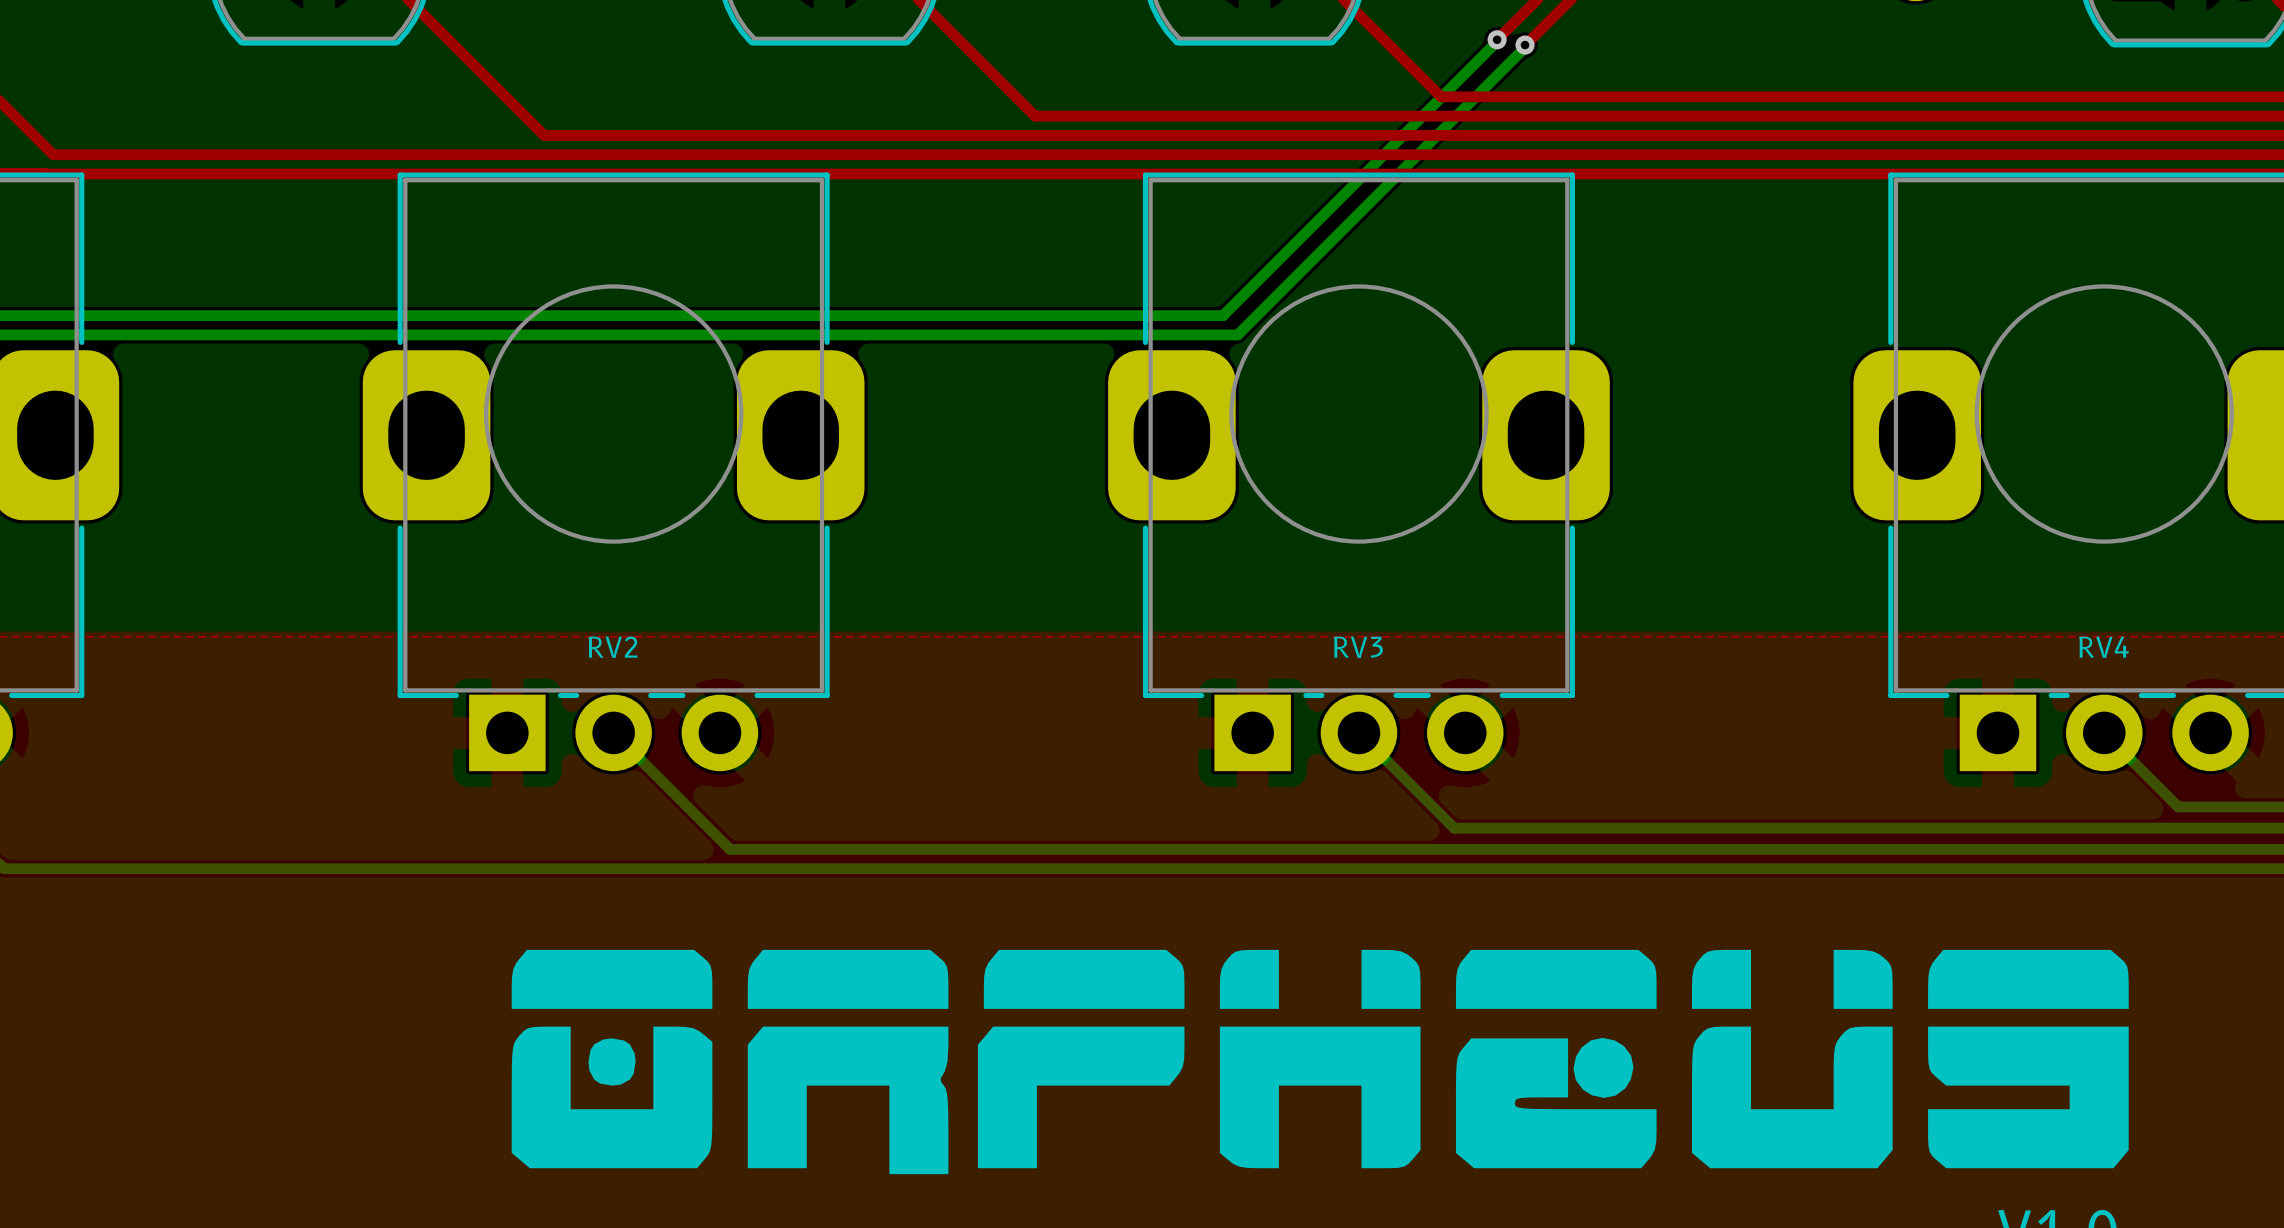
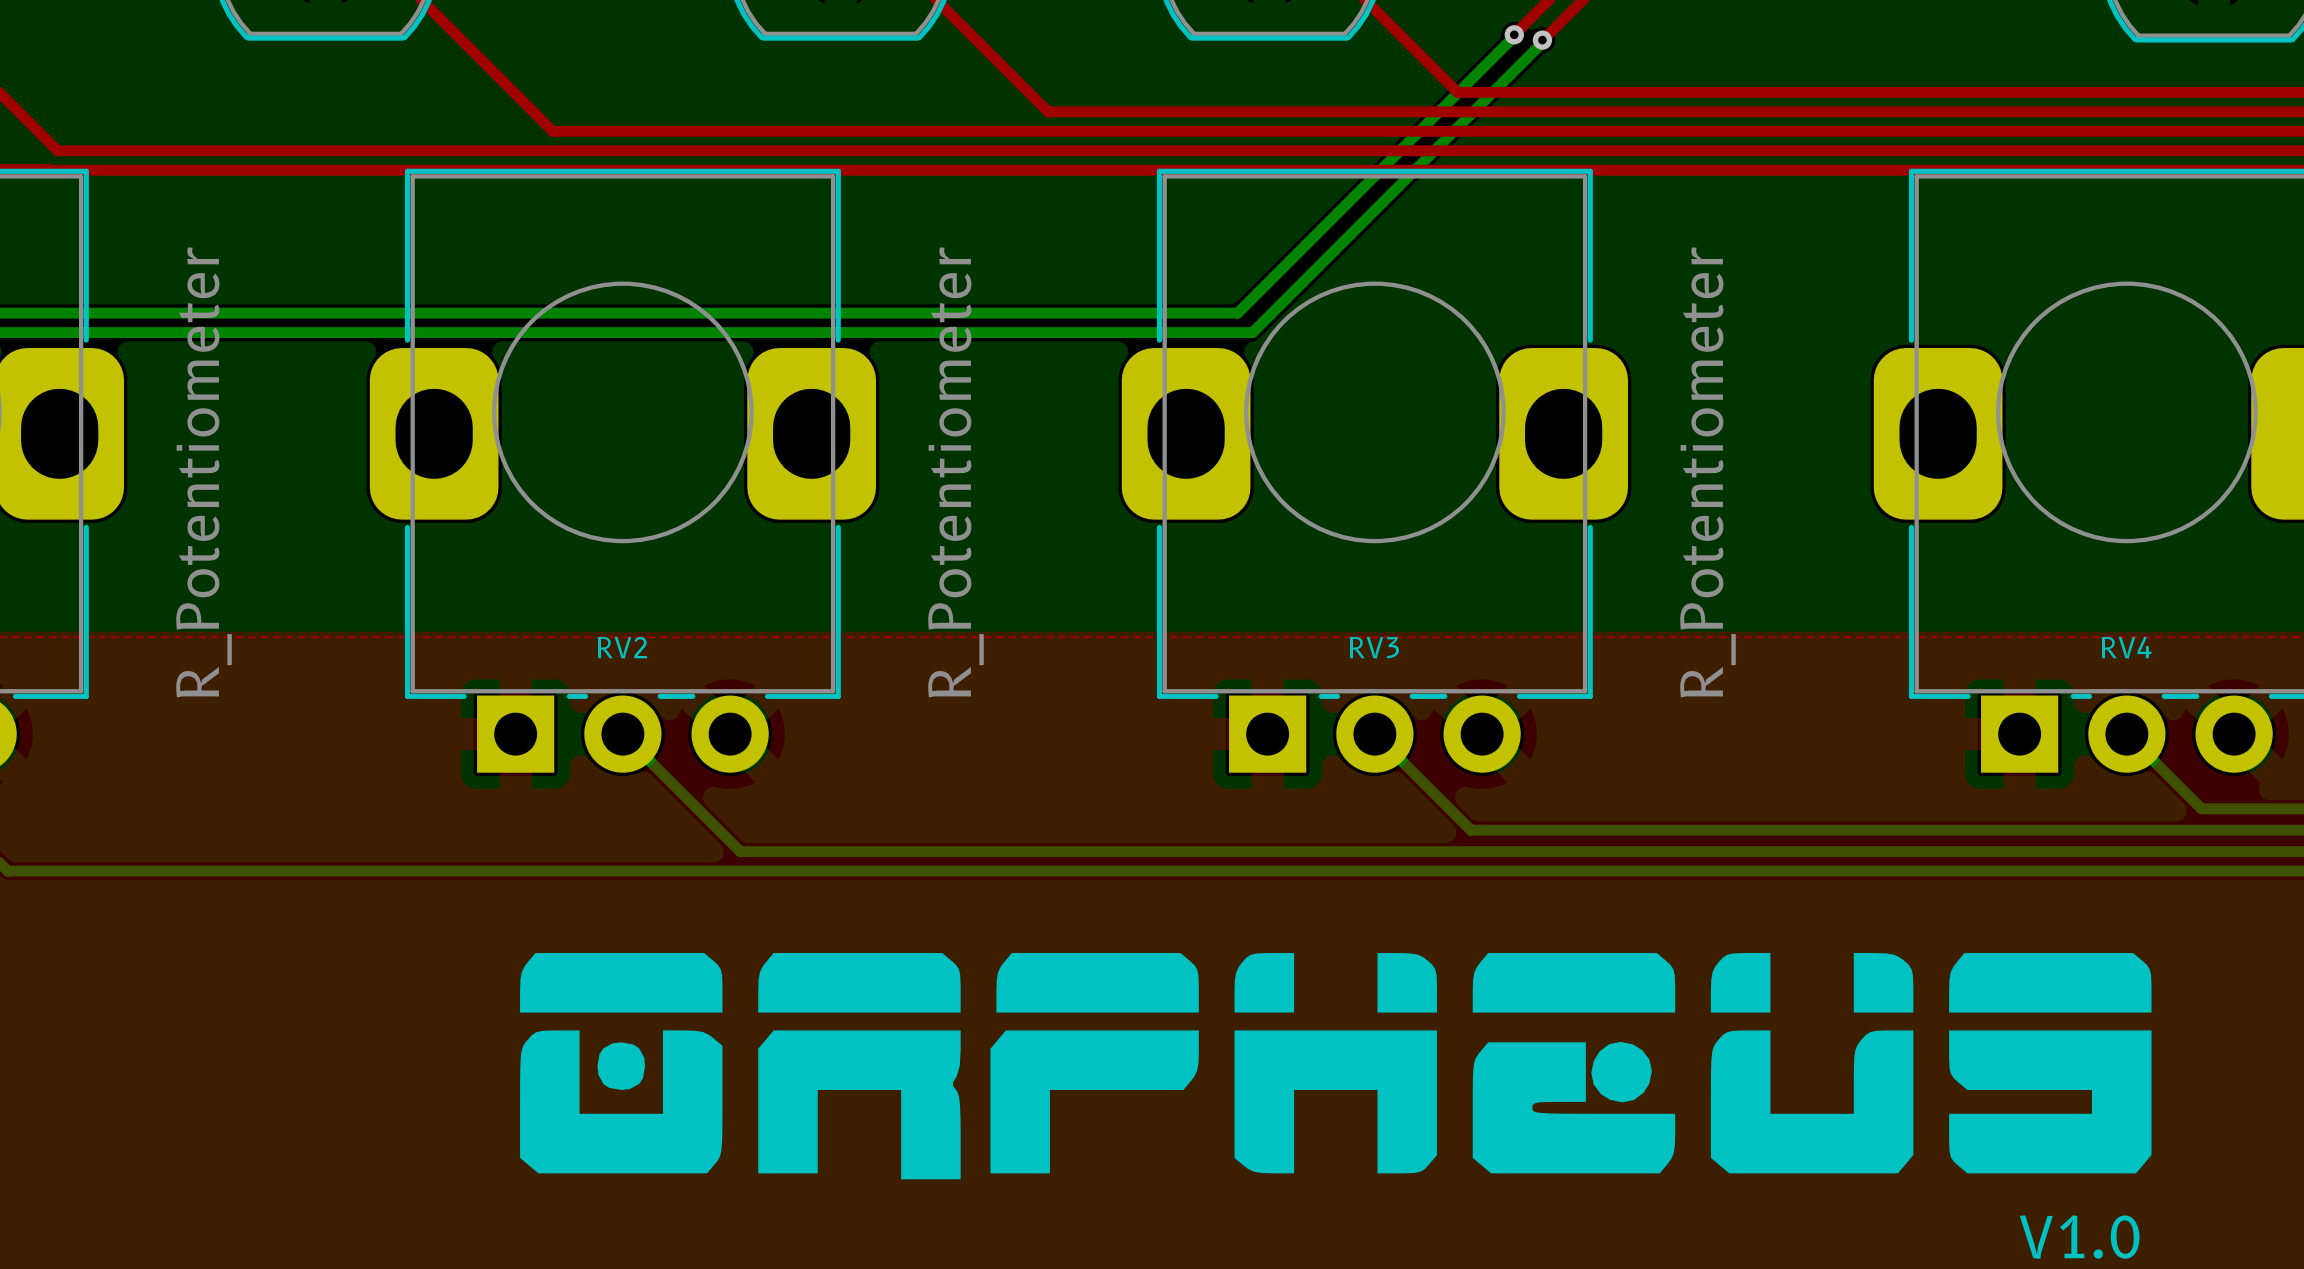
part value: none -> R_Potentiometer (204, 472)
RV2 value: none -> R_Potentiometer (956, 472)
RV3 value: none -> R_Potentiometer (1708, 472)

